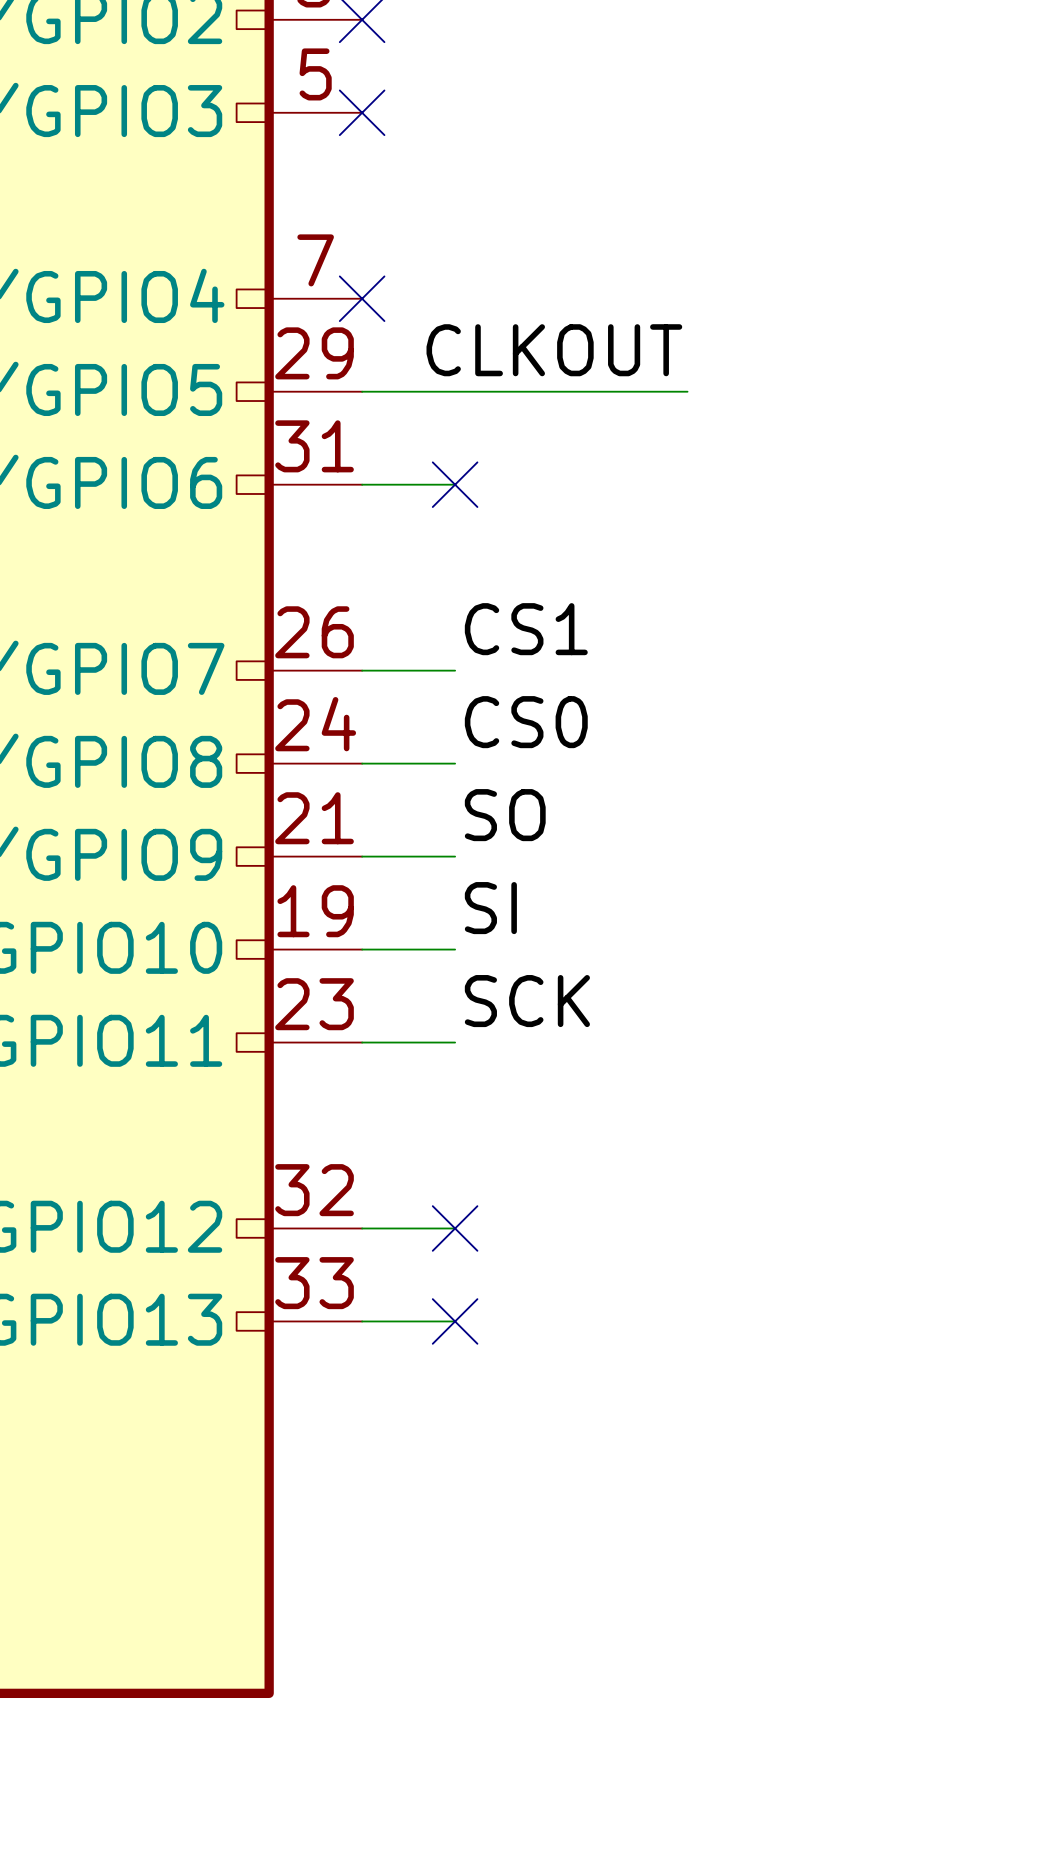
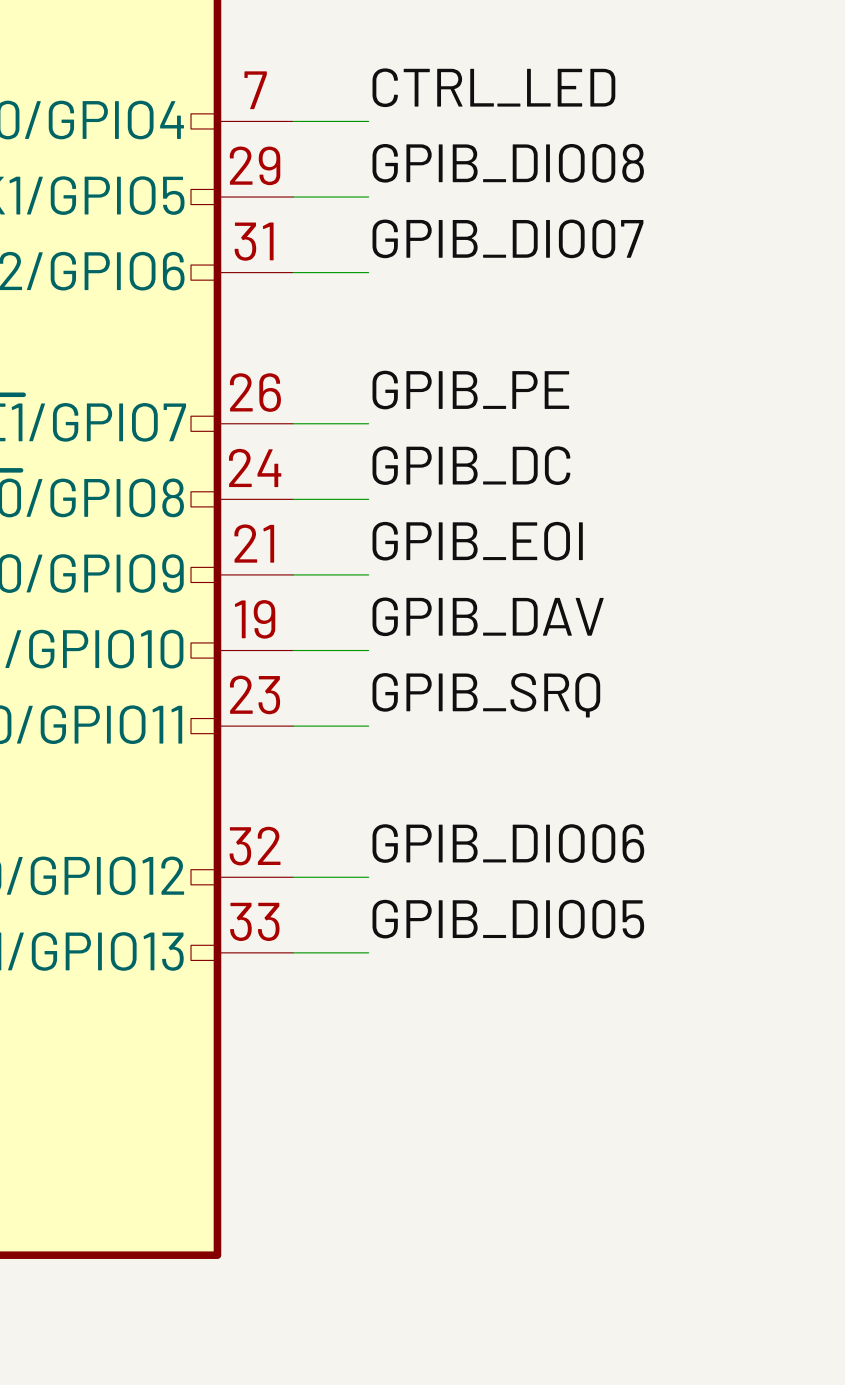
label: none -> CTRL_LED (493, 87)
wire: none -> (293, 121) (368, 121)
no-connect mark: (362, 298) -> none
label: CLKOUT (554, 350) -> none
label: none -> GPIB_DIO08 (508, 163)
wire: (455, 391) (687, 391) -> none
label: none -> GPIB_DIO07 (507, 238)
no-connect mark: (455, 484) -> none
label: CS1 (526, 629) -> GPIB_PE (470, 390)
label: CS0 (526, 722) -> GPIB_DC (471, 465)
label: SO (505, 815) -> GPIB_EOI (477, 541)
label: SI (490, 908) -> GPIB_DAV (488, 616)
label: SCK (527, 1001) -> GPIB_SRQ (486, 695)
label: none -> GPIB_DIO06 (508, 843)
no-connect mark: (455, 1228) -> none
label: none -> GPIB_DIO05 (508, 919)
no-connect mark: (455, 1321) -> none

